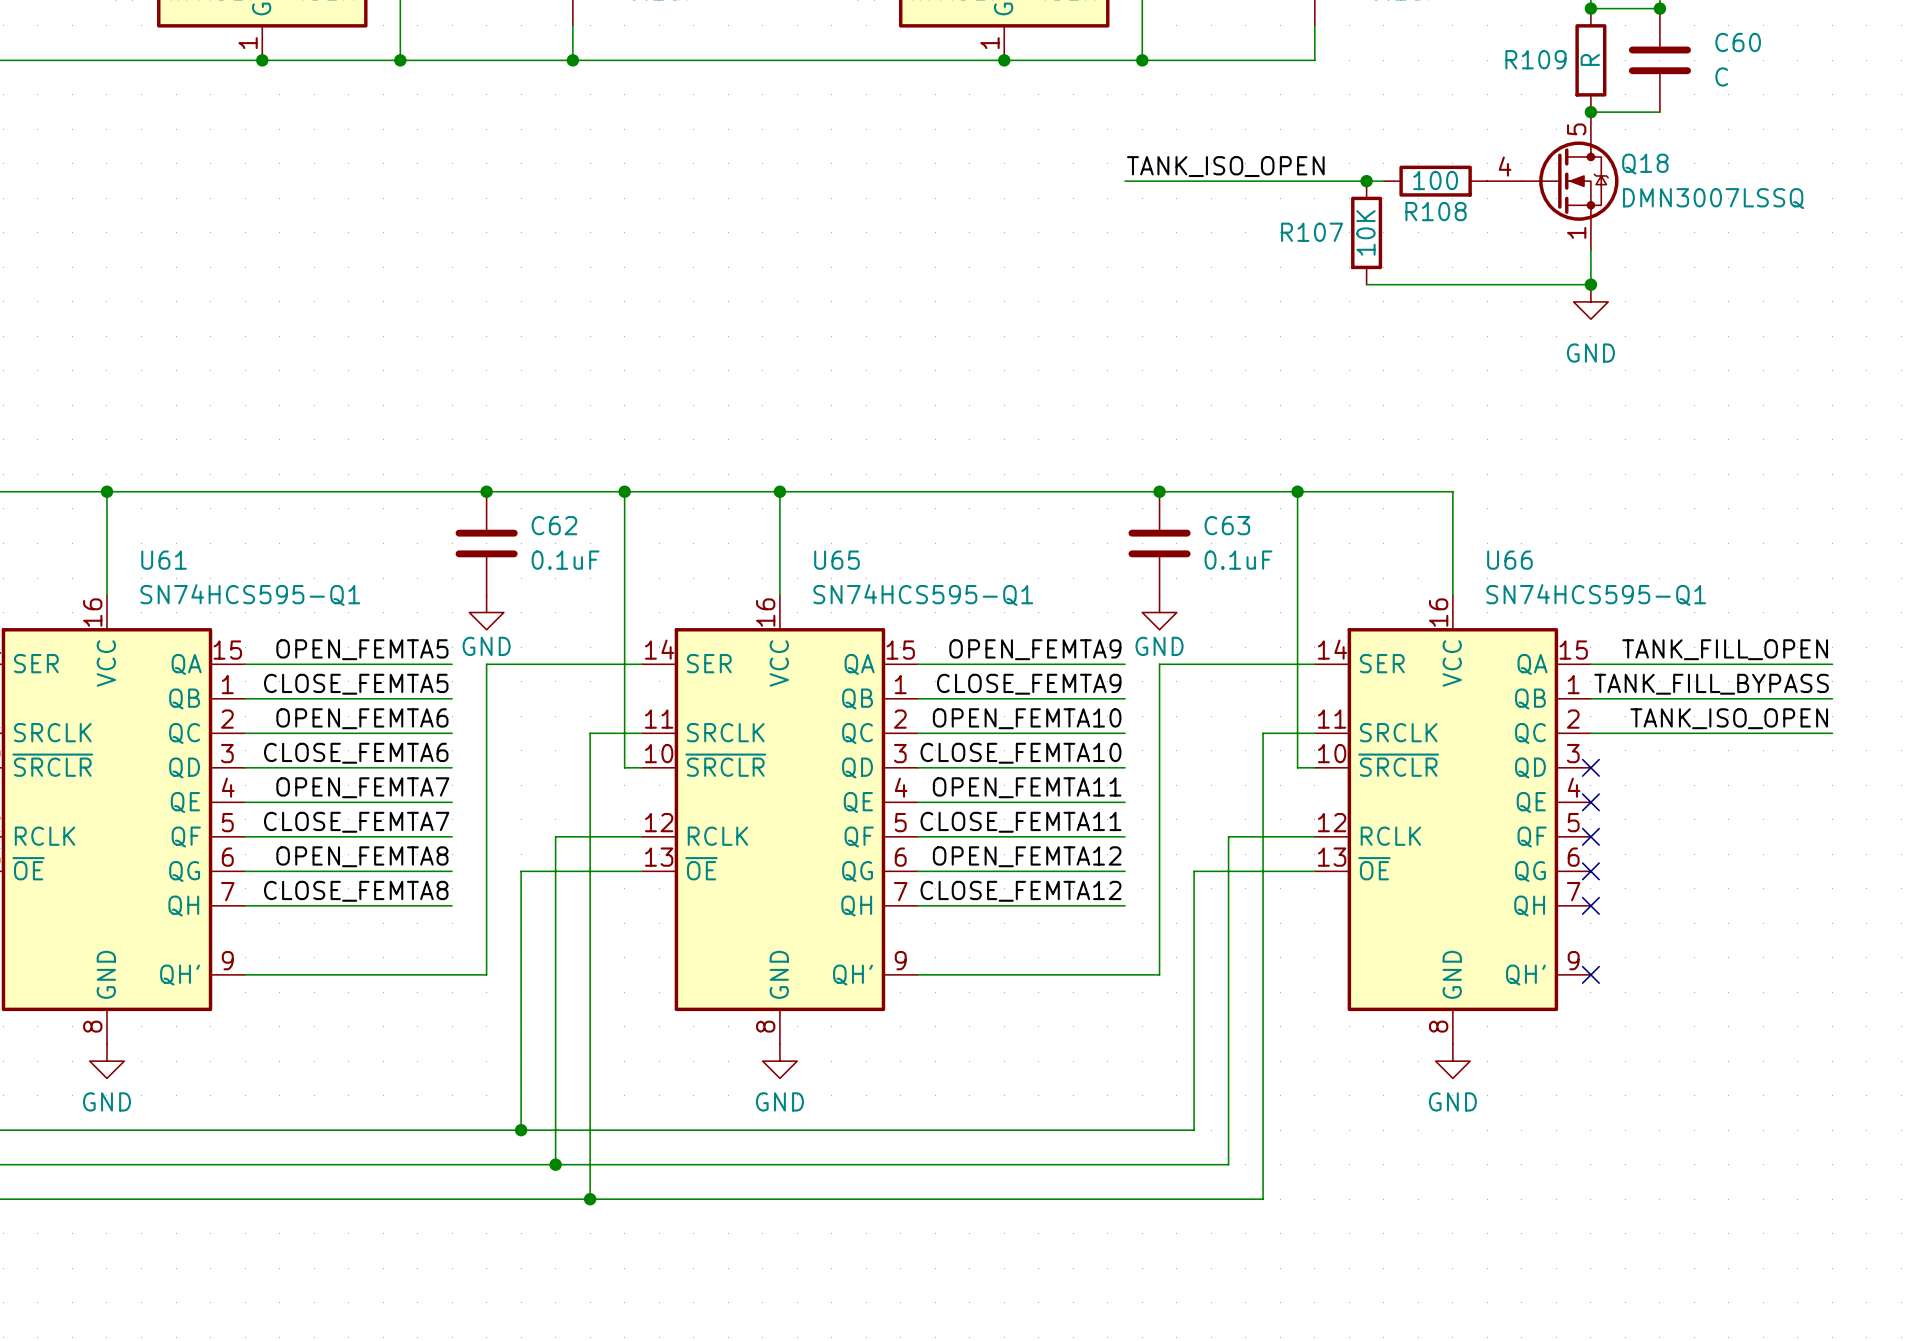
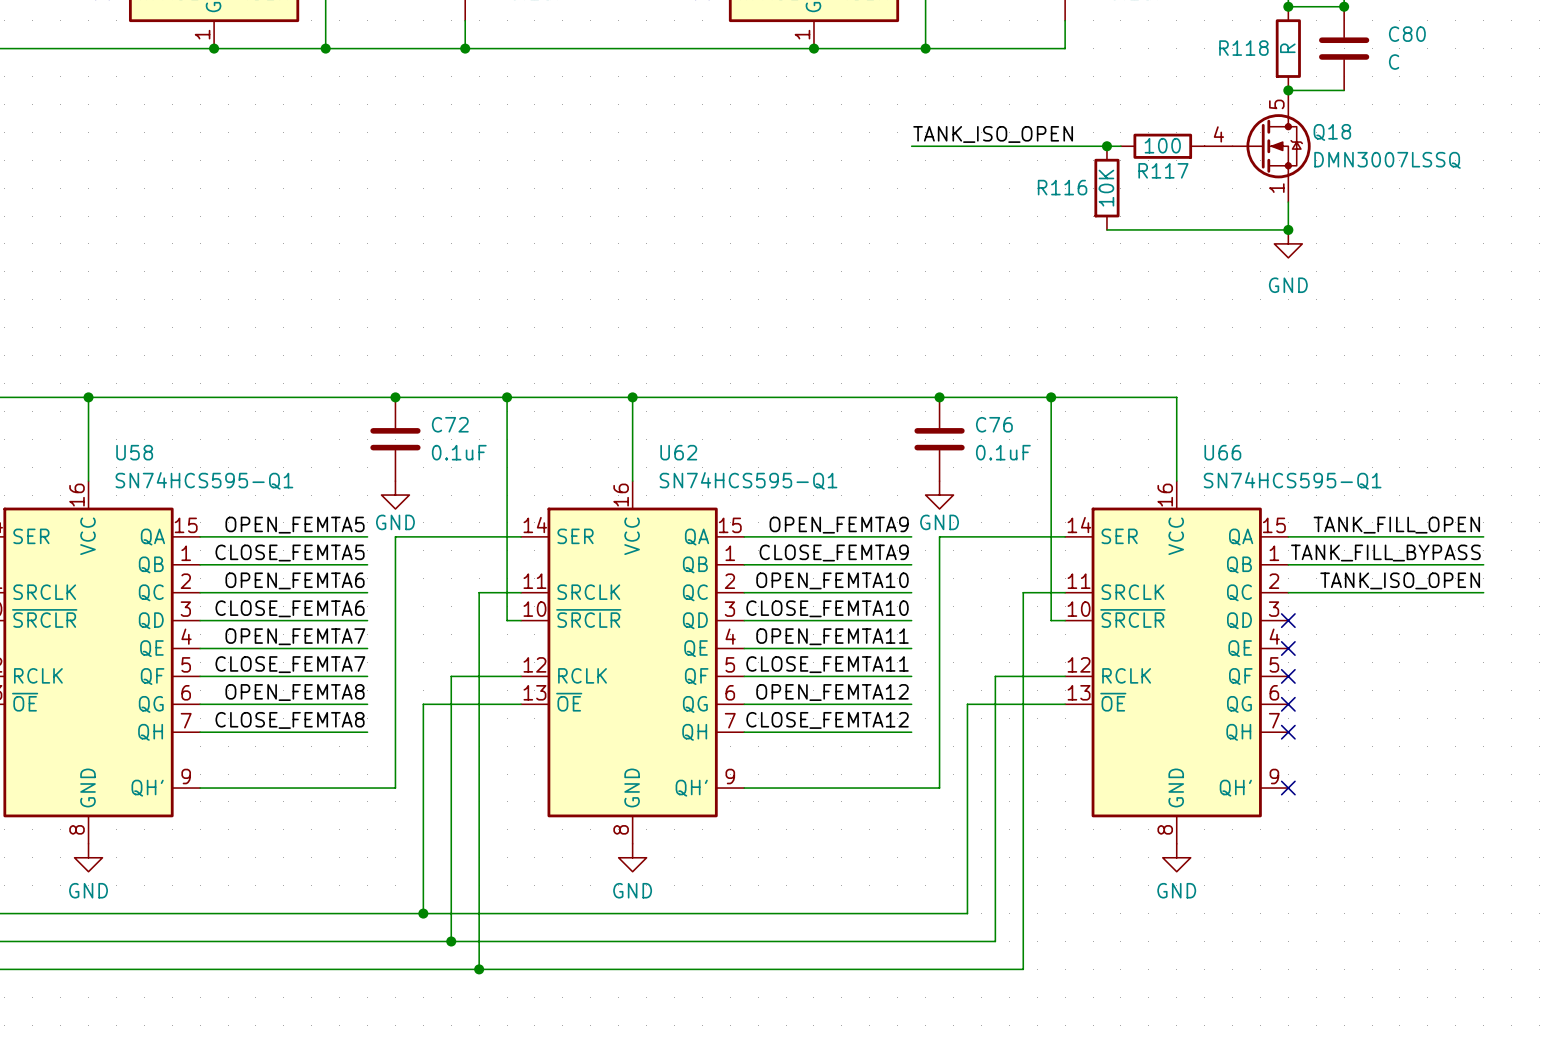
C60 name: C60 (1738, 42) -> C80 (1407, 34)
R109 name: R109 (1535, 59) -> R118 (1243, 48)
R108 name: R108 (1436, 211) -> R117 (1163, 170)
R107 name: R107 (1312, 232) -> R116 (1062, 187)
C62 name: C62 (554, 525) -> C72 (450, 424)
C63 name: C63 (1227, 525) -> C76 (994, 424)
U61 name: U61 (164, 560) -> U58 (134, 452)
U65 name: U65 (836, 560) -> U62 (678, 452)

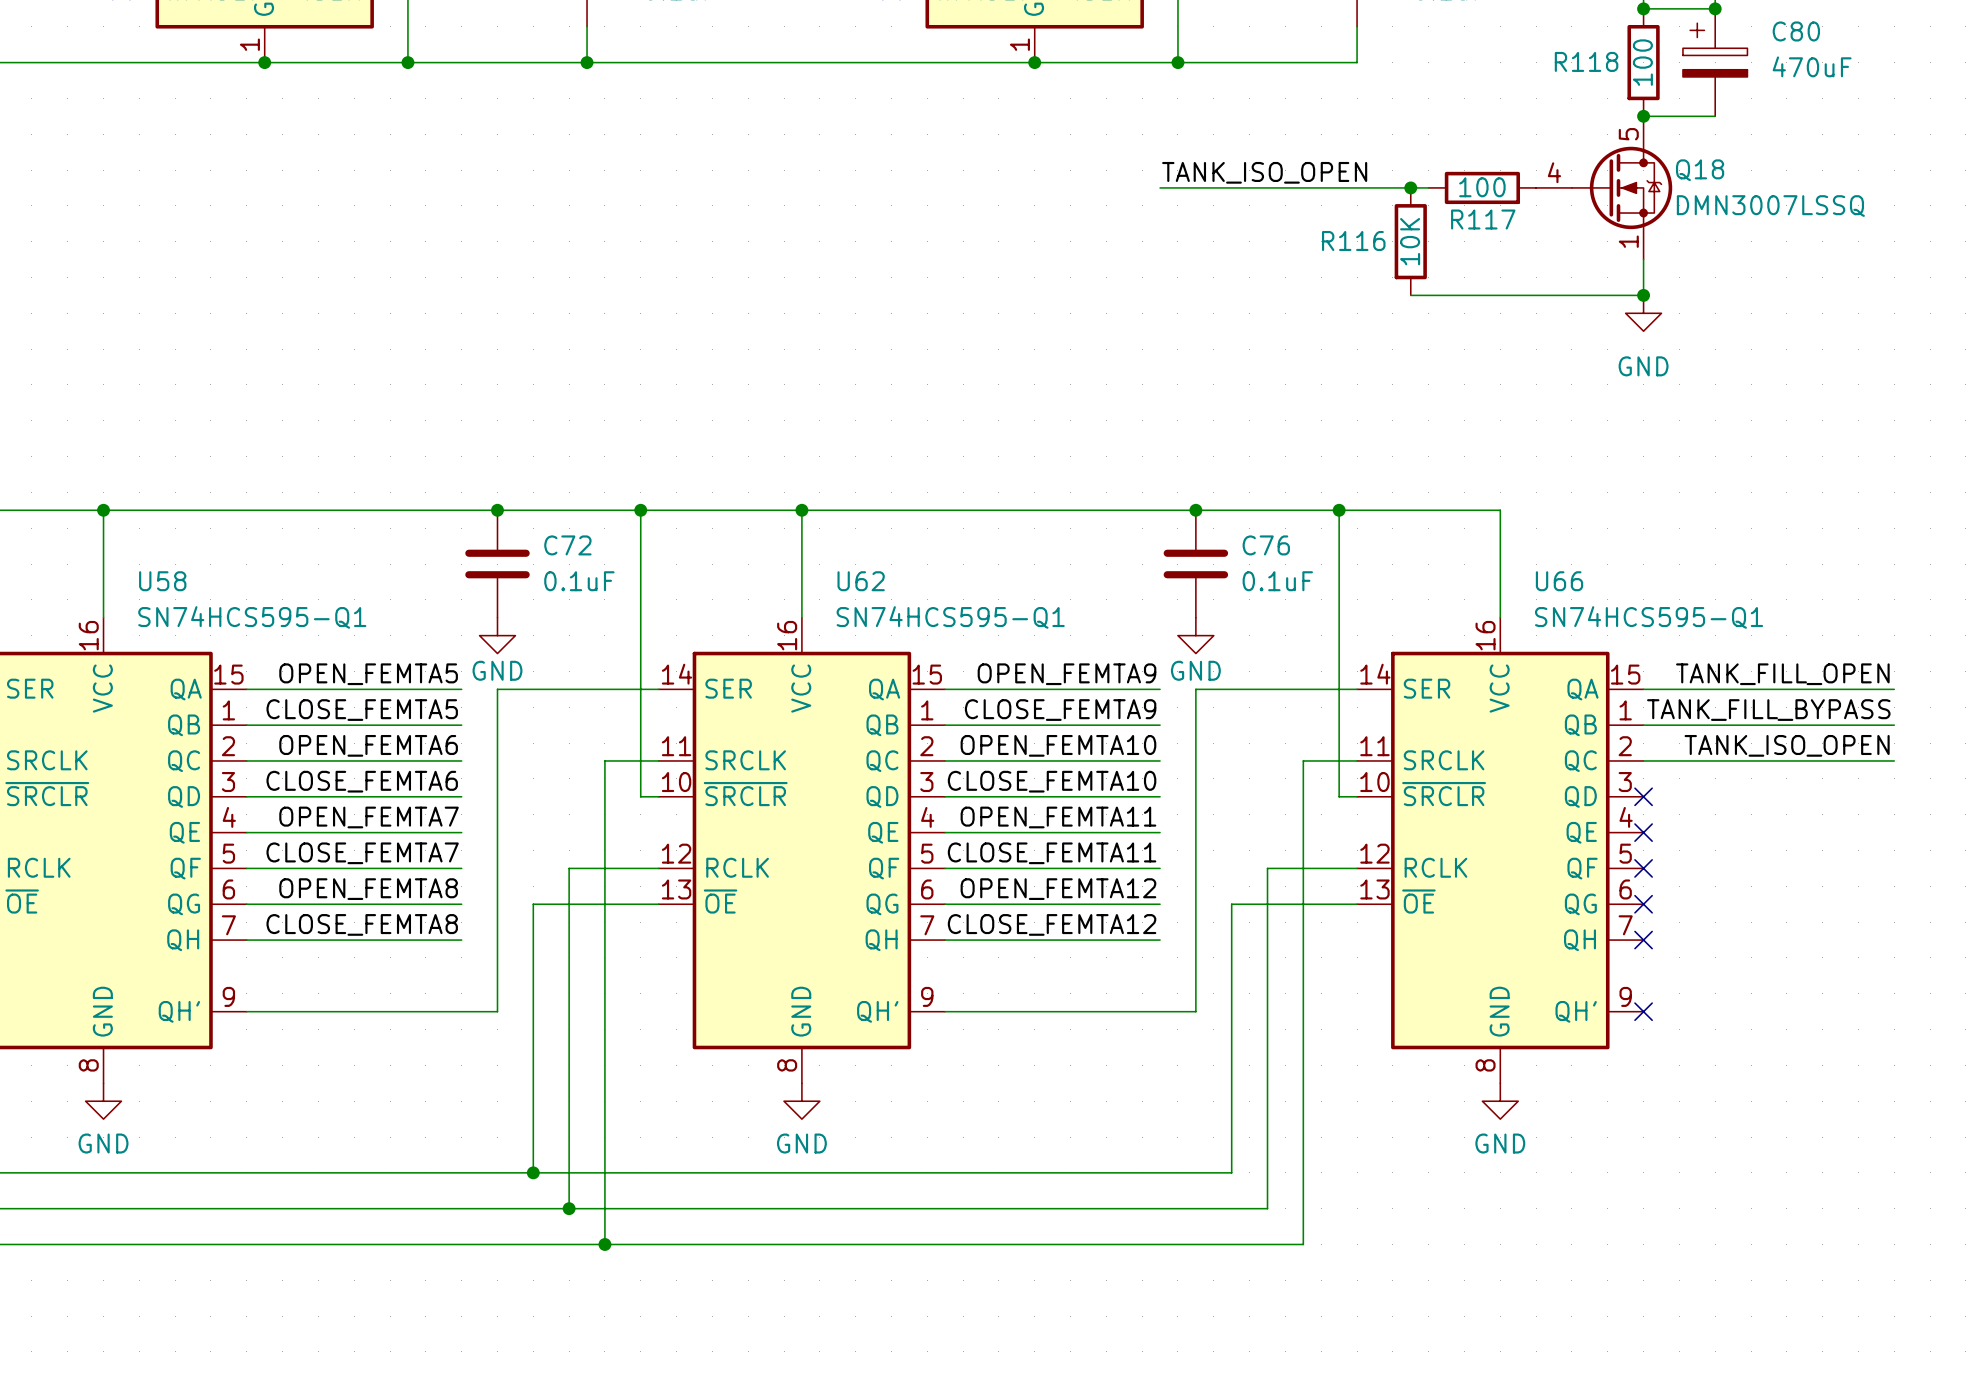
C80 symbol: [1319, 6, 1370, 91] -> [1682, 8, 1748, 117]
R118 value: R (1287, 48) -> 100 (1642, 62)
C80 value: C (1394, 62) -> 470uF (1812, 66)

